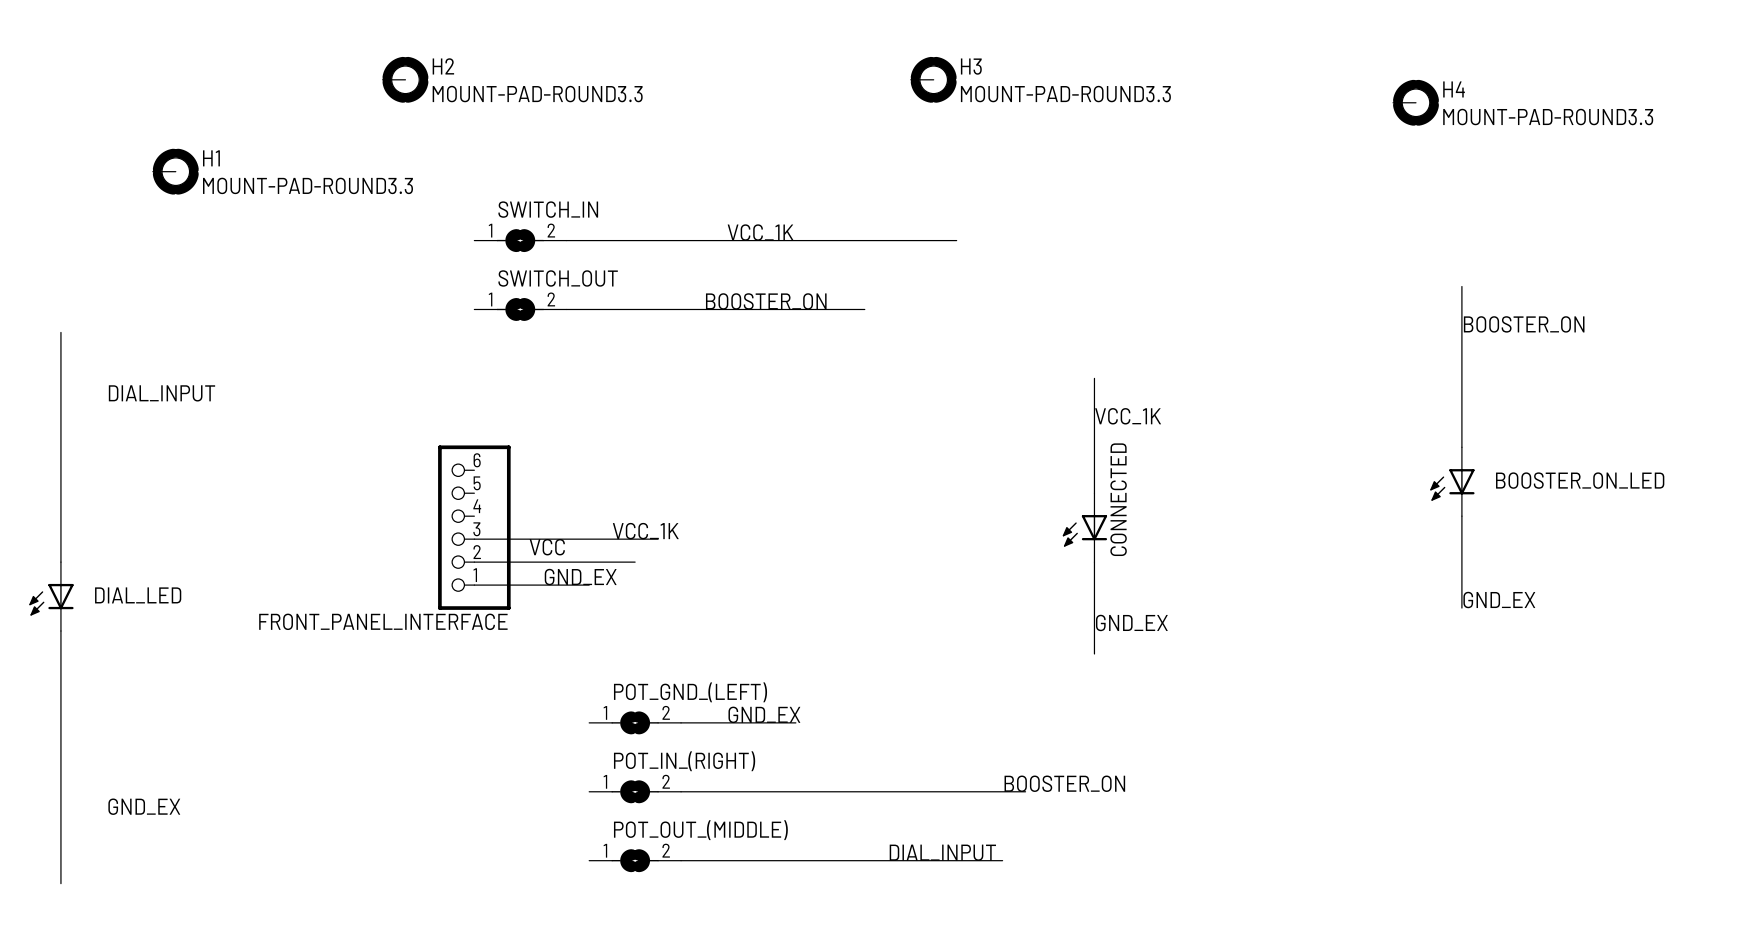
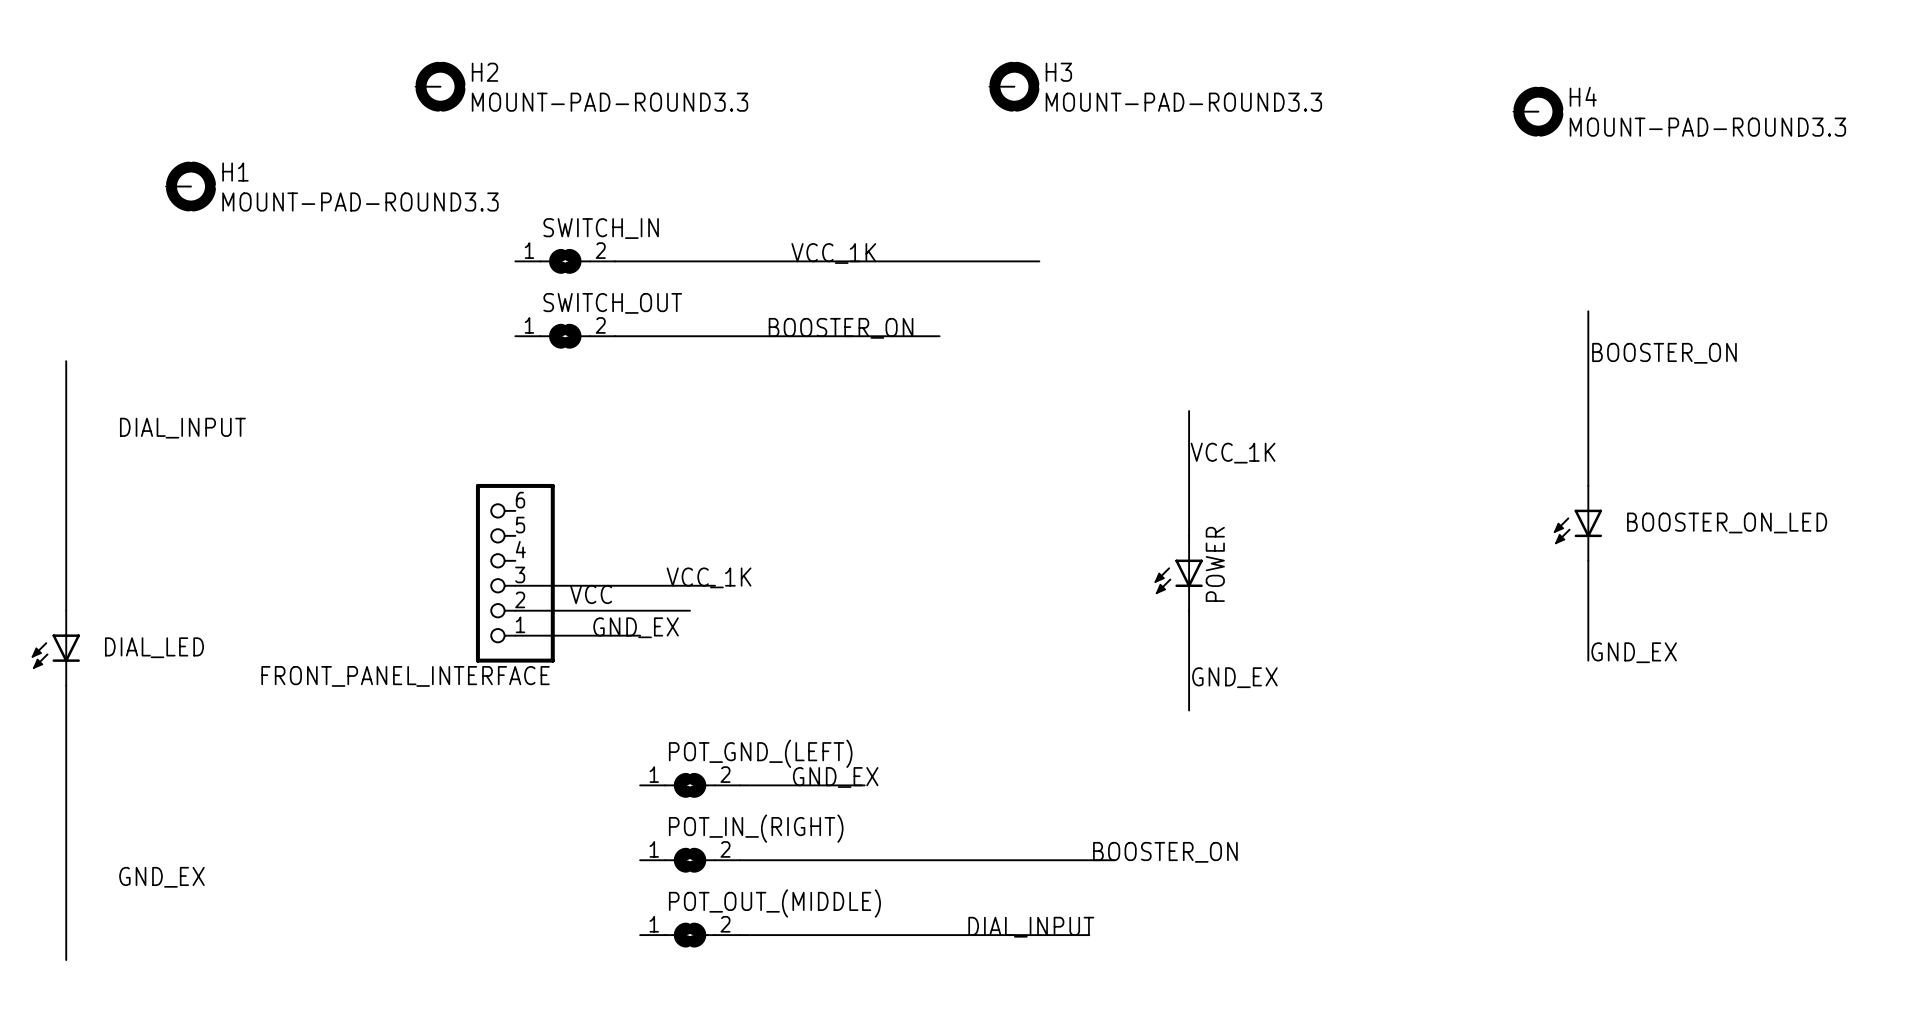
CONNECTED name: CONNECTED (1118, 499) -> POWER (1215, 564)

